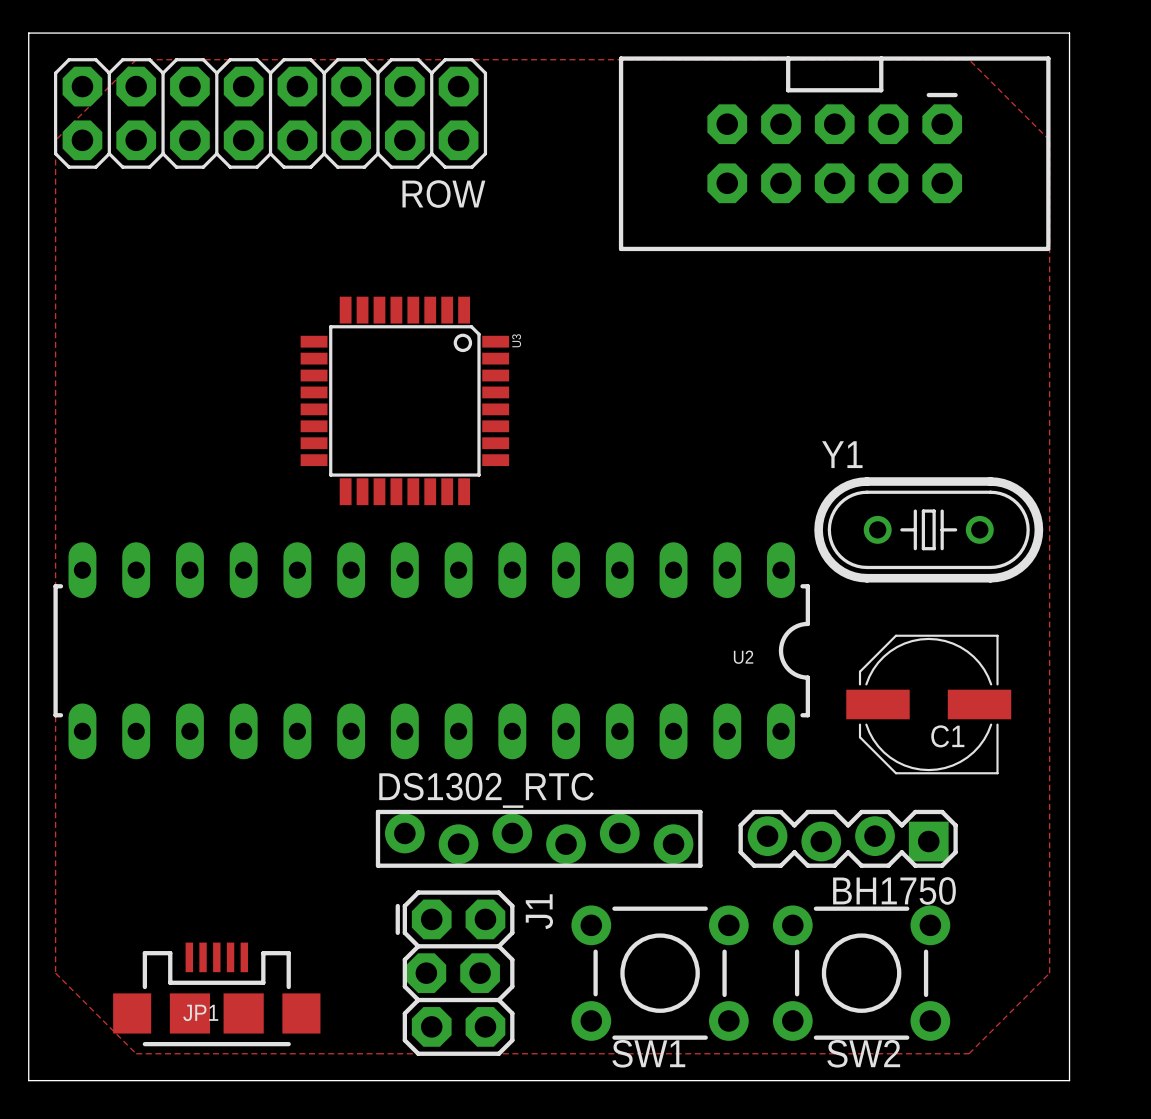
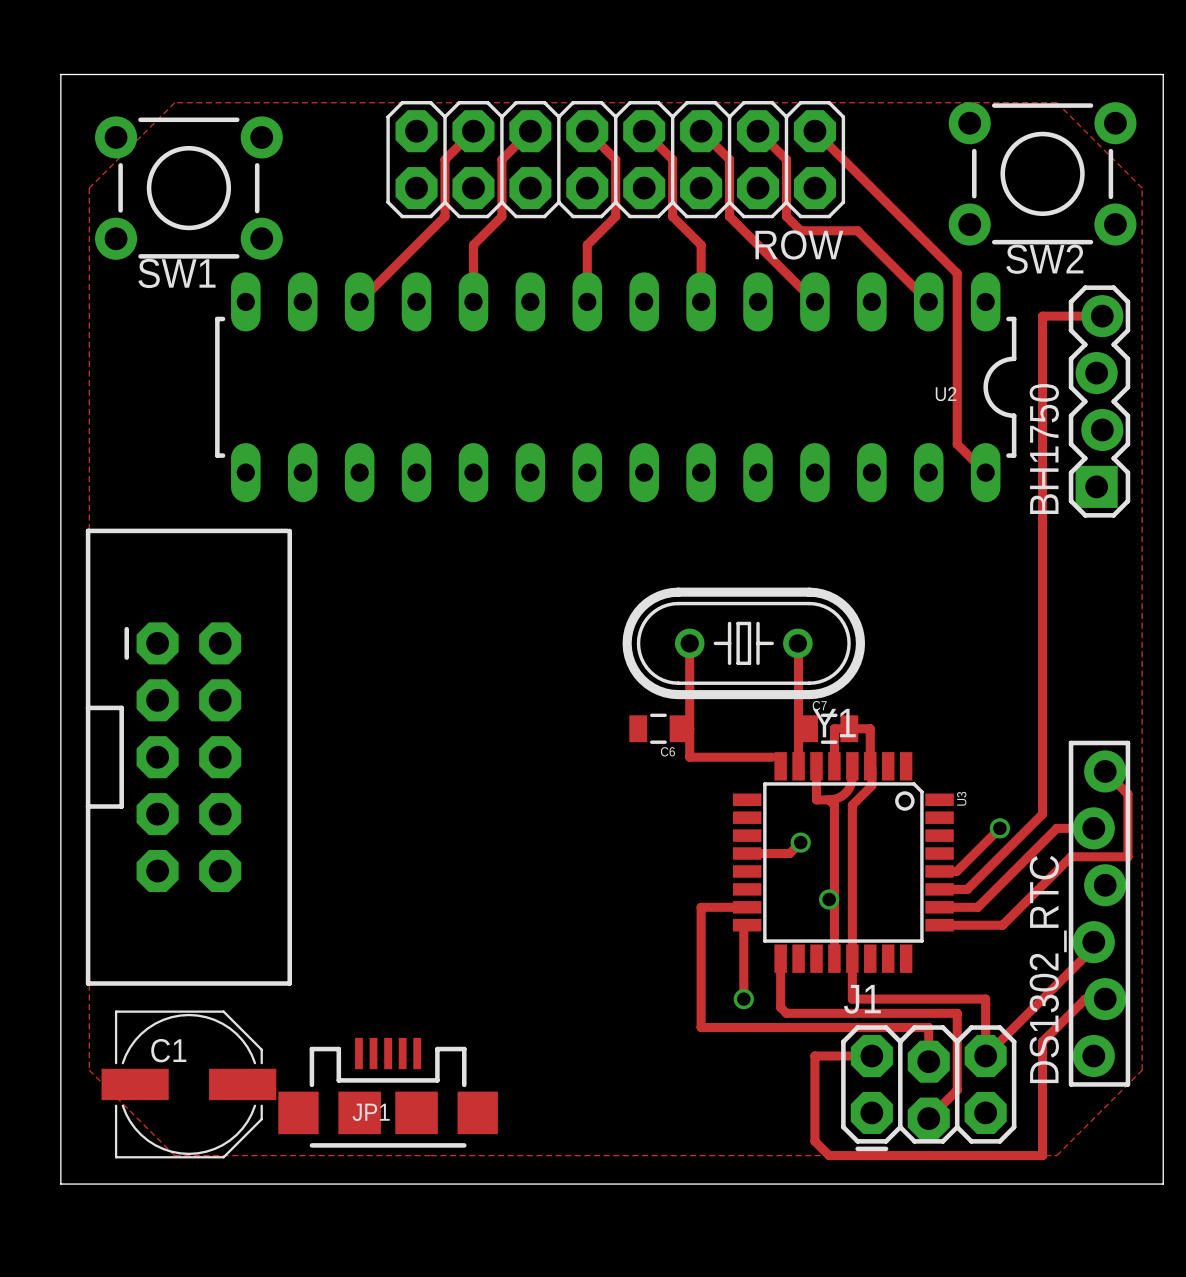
track: none -> (473, 131) (445, 159) (445, 216) (359, 301)
track: none -> (530, 131) (501, 159) (501, 216) (473, 245) (473, 301)
track: none -> (587, 131) (615, 159) (615, 216) (587, 245) (587, 301)
track: none -> (644, 131) (672, 159) (672, 216) (701, 245) (701, 301)
track: none -> (701, 131) (729, 159) (729, 216) (814, 301)
track: none -> (758, 131) (786, 159) (786, 216) (800, 230) (857, 230) (928, 301)
track: none -> (814, 131) (957, 273) (957, 444) (985, 472)
ROW position: (270, 113) -> (615, 159)
part: (834, 153) -> none
track: none -> (1102, 316) (1042, 316) (1042, 814) (967, 889) (939, 889)
U3 position: (404, 400) -> (843, 862)
Y1 name position: Y1 (842, 454) -> Y1 (834, 723)
Y1 position: (928, 529) -> (743, 643)
track: none -> (689, 643) (689, 757) (772, 757)
track: none -> (797, 643) (798, 766)
U2 position: (431, 650) -> (615, 387)
C6: none -> (658, 728)
C7: none -> (829, 728)
part: none -> (188, 757)
track: none -> (816, 766) (816, 799) (829, 799)
track: none -> (834, 766) (834, 728) (870, 728) (871, 785) (852, 805) (852, 999) (985, 999) (985, 1056) (1093, 947) (1093, 942)
track: none -> (852, 766) (852, 779) (847, 790) (840, 796) (829, 799)
track: none -> (1105, 771) (1127, 794) (1127, 856) (1071, 856) (1002, 925) (939, 925)
C1 rotation: 0° (928, 704) -> 180° (188, 1084)
C1 position: (928, 704) -> (188, 1084)
track: none -> (829, 799) (834, 805) (834, 958)
track: none -> (999, 828) (956, 871) (939, 871)
via: none -> (999, 828)
track: none -> (1093, 828) (1056, 828) (977, 907) (939, 907)
track: none -> (800, 842) (789, 853) (747, 853)
via: none -> (800, 842)
DS1302_RTC name position: DS1302_RTC (486, 790) -> DS1302_RTC (1048, 969)
via: none -> (829, 899)
track: none -> (747, 907) (701, 907) (701, 1027) (928, 1027) (928, 1061)
track: none -> (747, 925) (743, 925) (743, 999)
DS1302_RTC rotation: 0° (539, 838) -> 90° clockwise (1099, 913)
DS1302_RTC position: (539, 838) -> (1099, 913)
BH1750 rotation: 0° (848, 838) -> 90° clockwise (1099, 401)
BH1750 position: (848, 838) -> (1099, 401)
track: none -> (780, 958) (780, 1007) (786, 1013) (957, 1013) (957, 1090) (928, 1118)
via: none -> (743, 999)
track: none -> (1105, 999) (1085, 999) (1042, 1041) (1042, 1155) (829, 1155) (814, 1141) (814, 1056) (871, 1056)
J1 rotation: 0° (455, 973) -> 90° counterclockwise (928, 1088)
J1 position: (455, 973) -> (928, 1088)
SW1 position: (660, 973) -> (188, 188)
SW2 position: (861, 973) -> (1042, 173)
JP1 position: (216, 994) -> (388, 1092)

